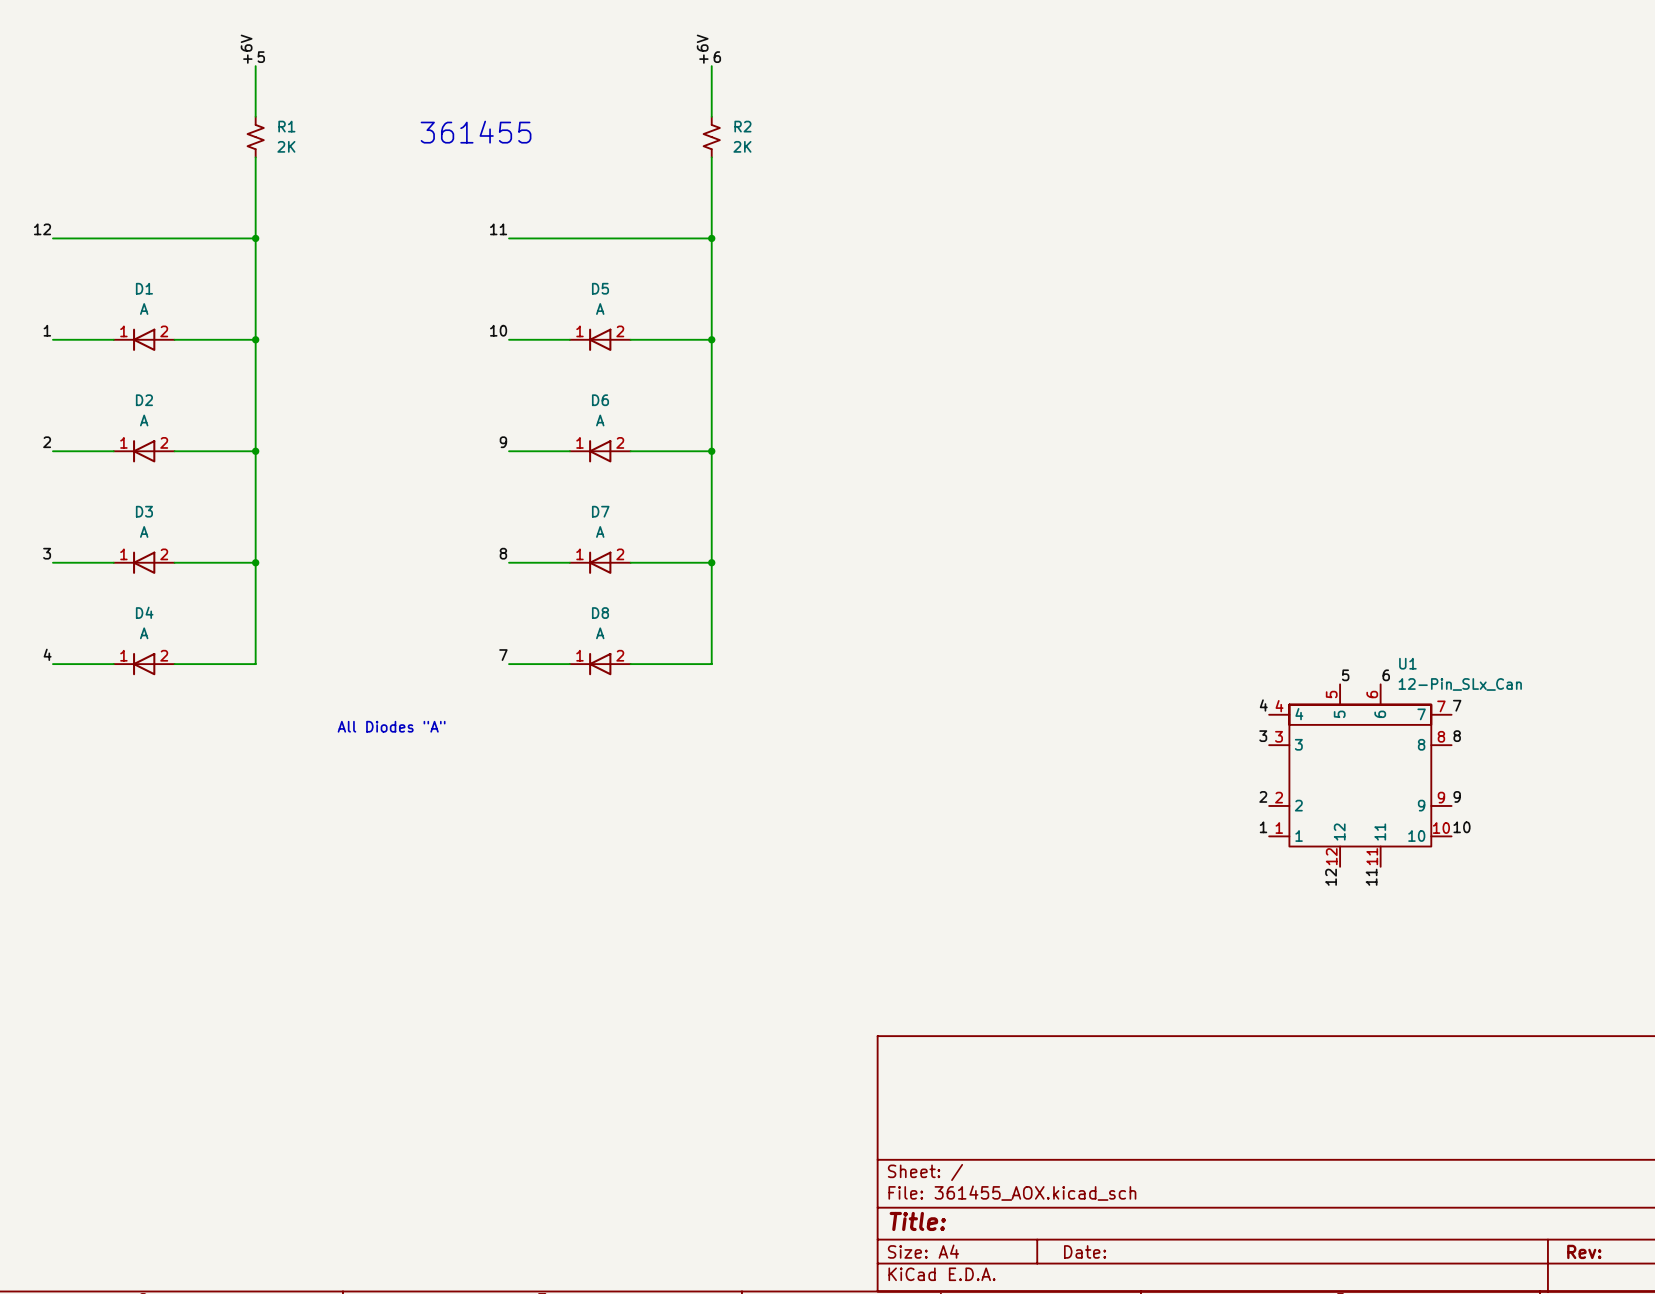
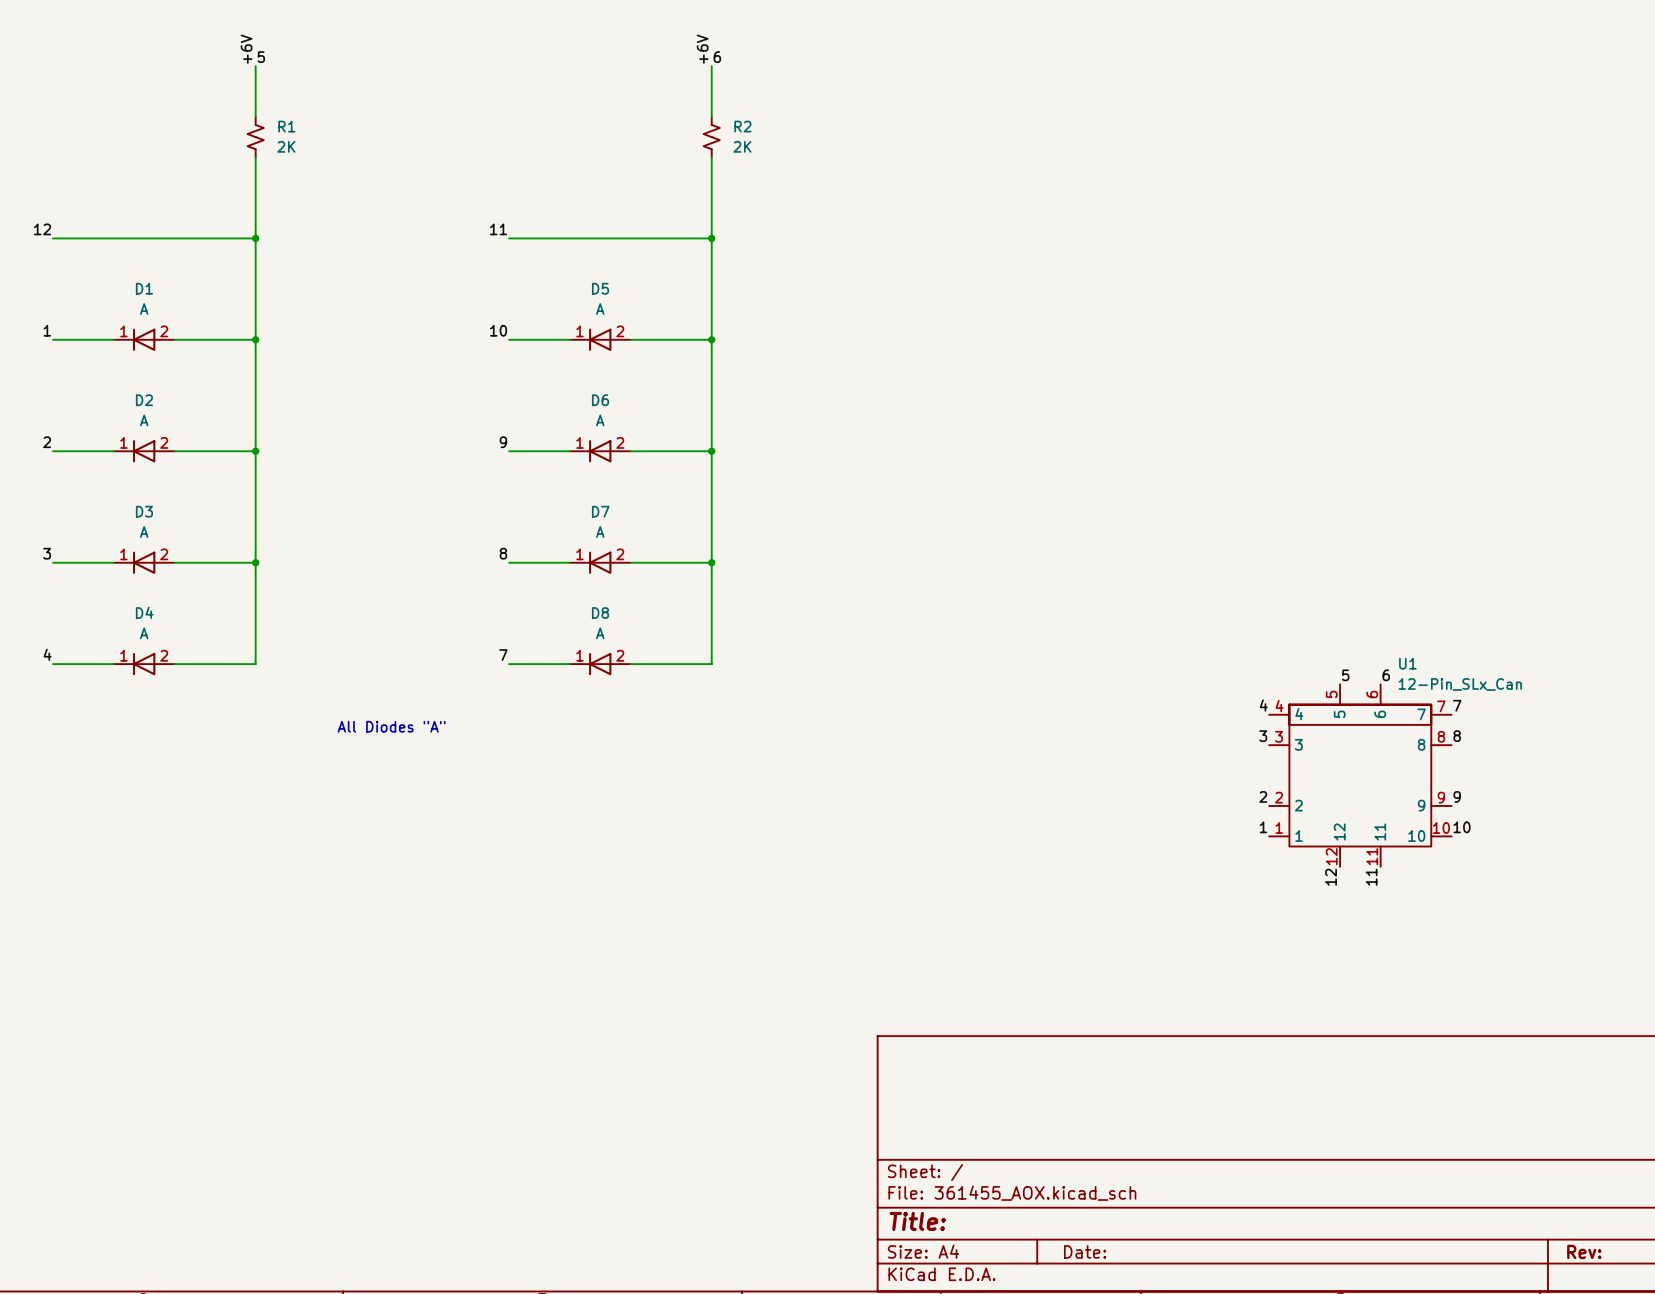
text: 361455 (476, 132) -> none

